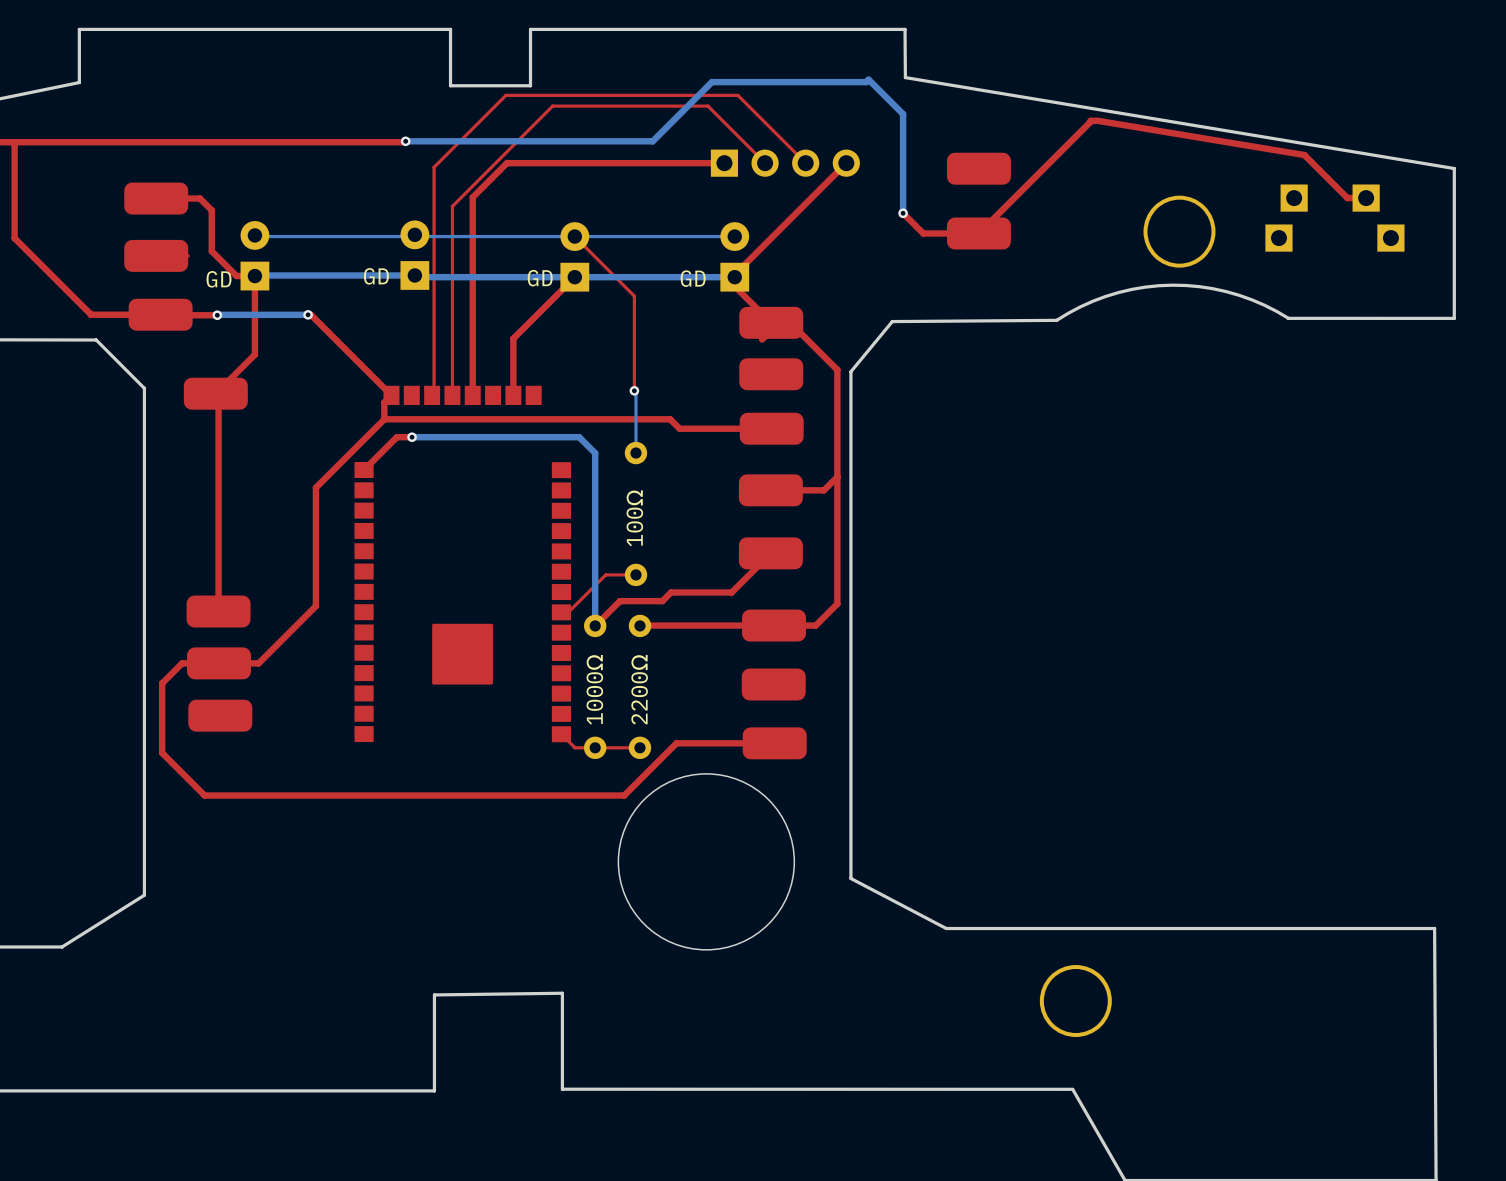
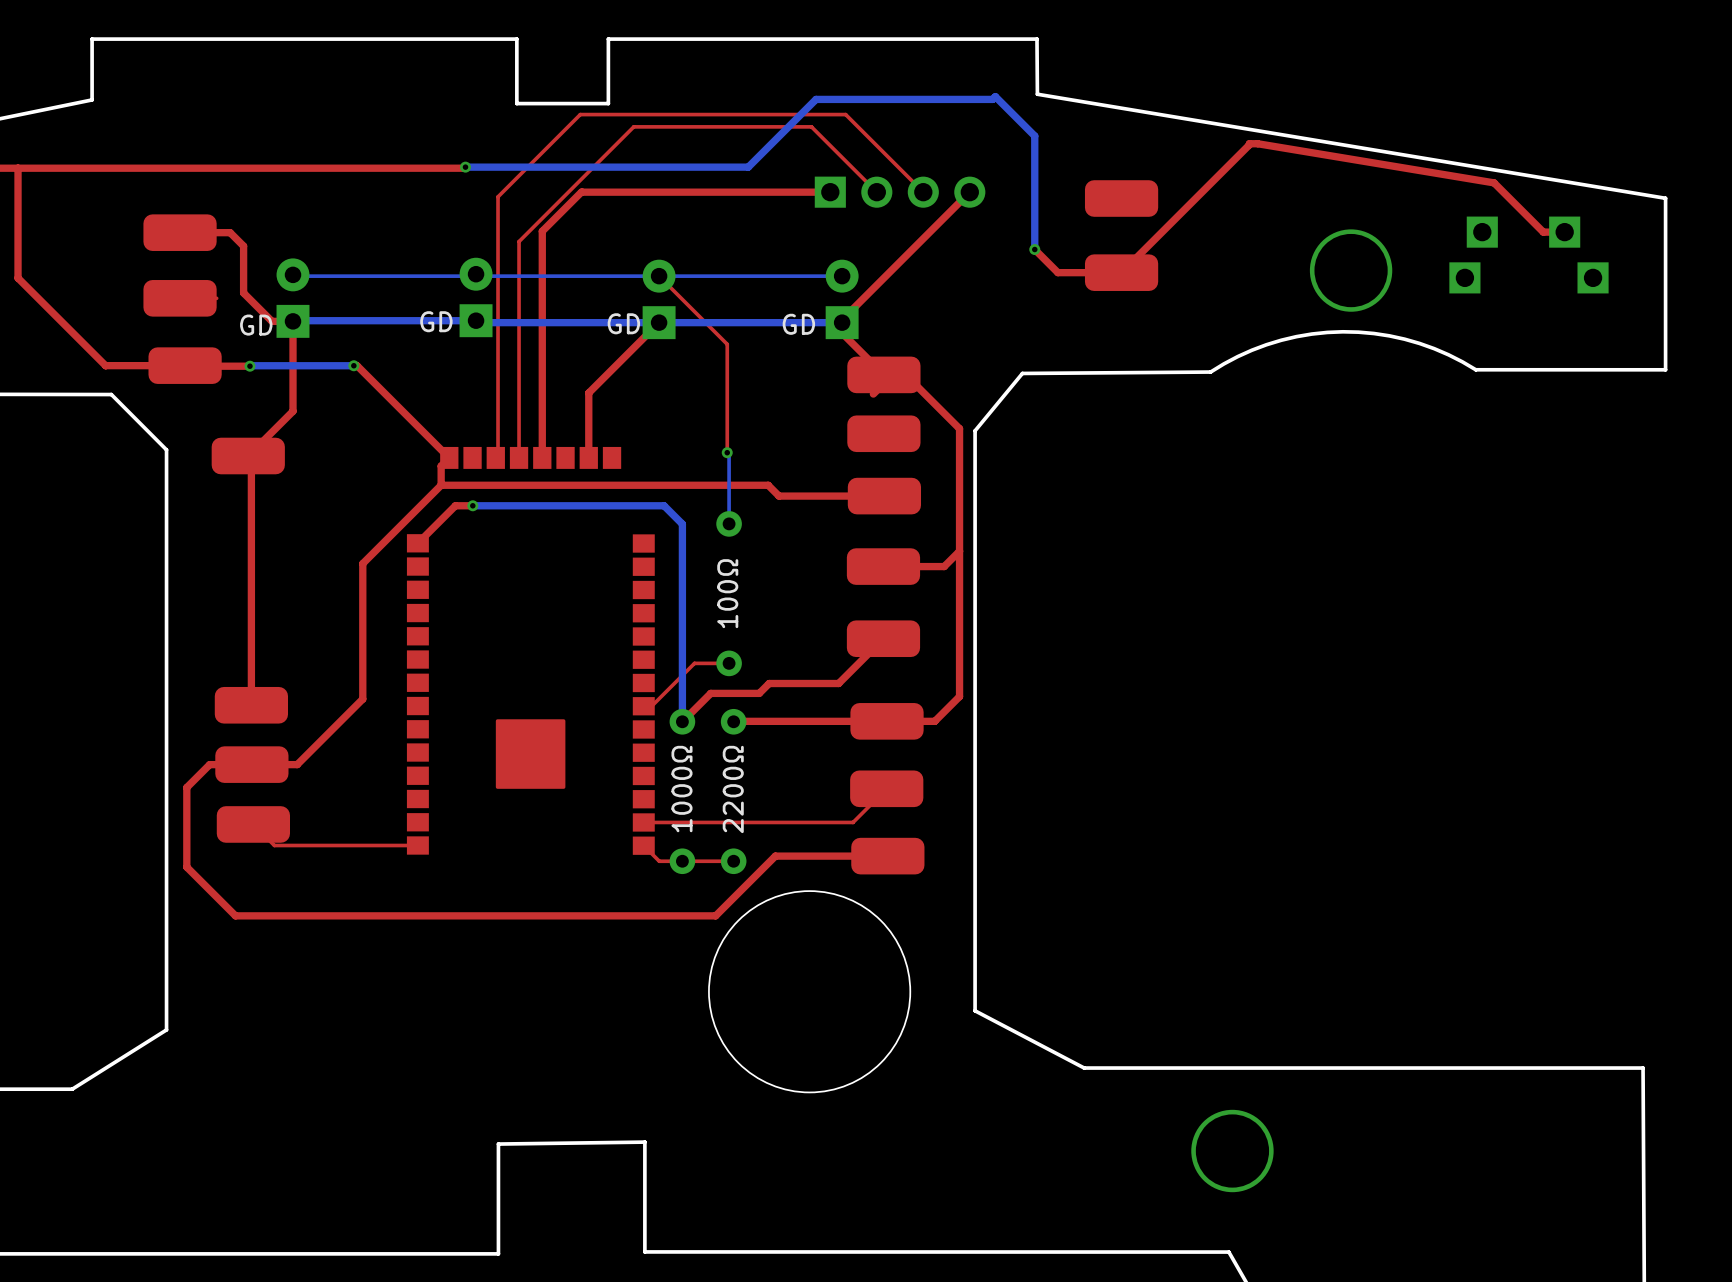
top track: none -> (886, 788) (853, 822) (643, 822)
top track: none -> (253, 824) (274, 845) (417, 845)

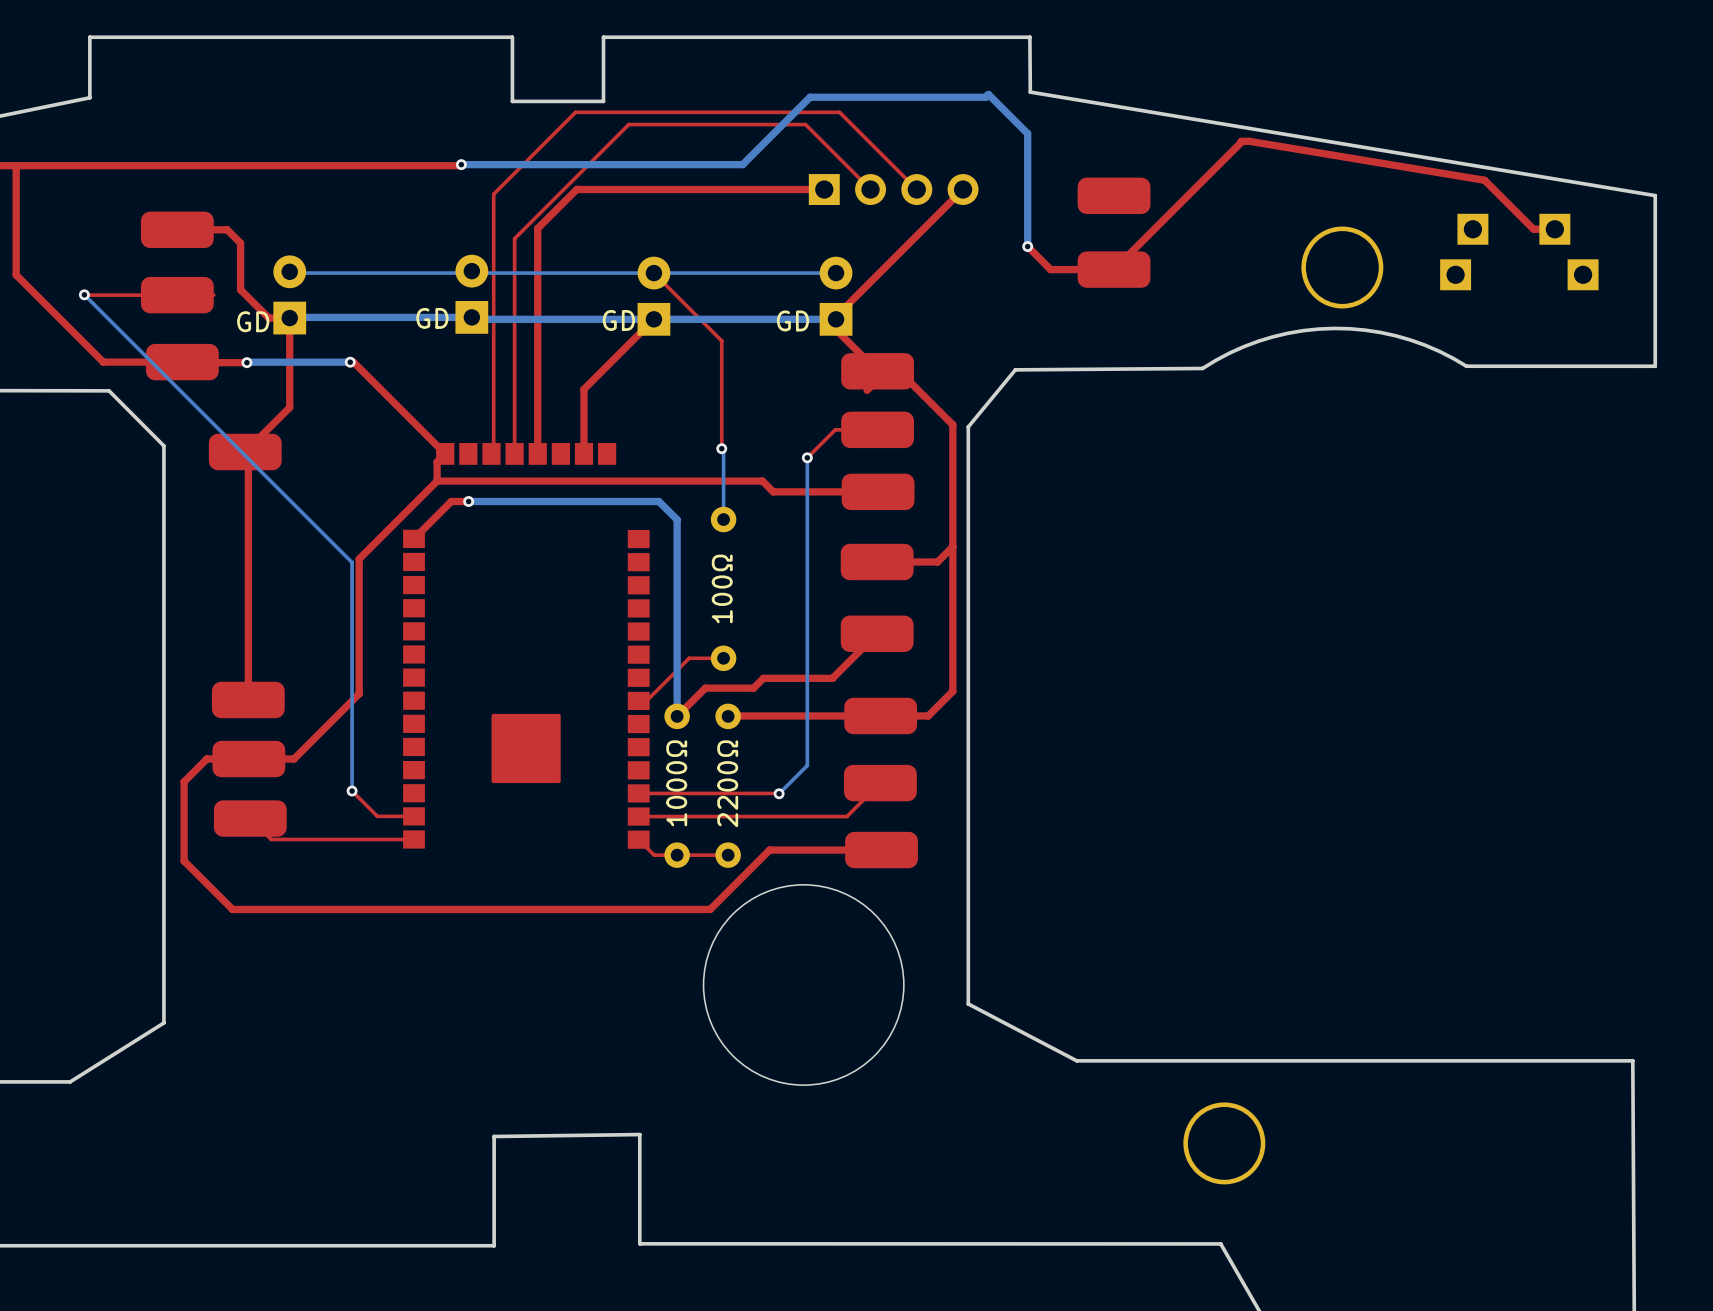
top track: none -> (84, 294) (177, 295)
bottom track: none -> (84, 294) (352, 562) (352, 791)
via: none -> (84, 294)
top track: none -> (877, 429) (835, 429) (807, 457)
bottom track: none -> (807, 457) (807, 765) (779, 793)
via: none -> (807, 457)
top track: none -> (352, 791) (377, 816) (414, 816)
via: none -> (352, 791)
top track: none -> (638, 793) (779, 793)
via: none -> (779, 793)

